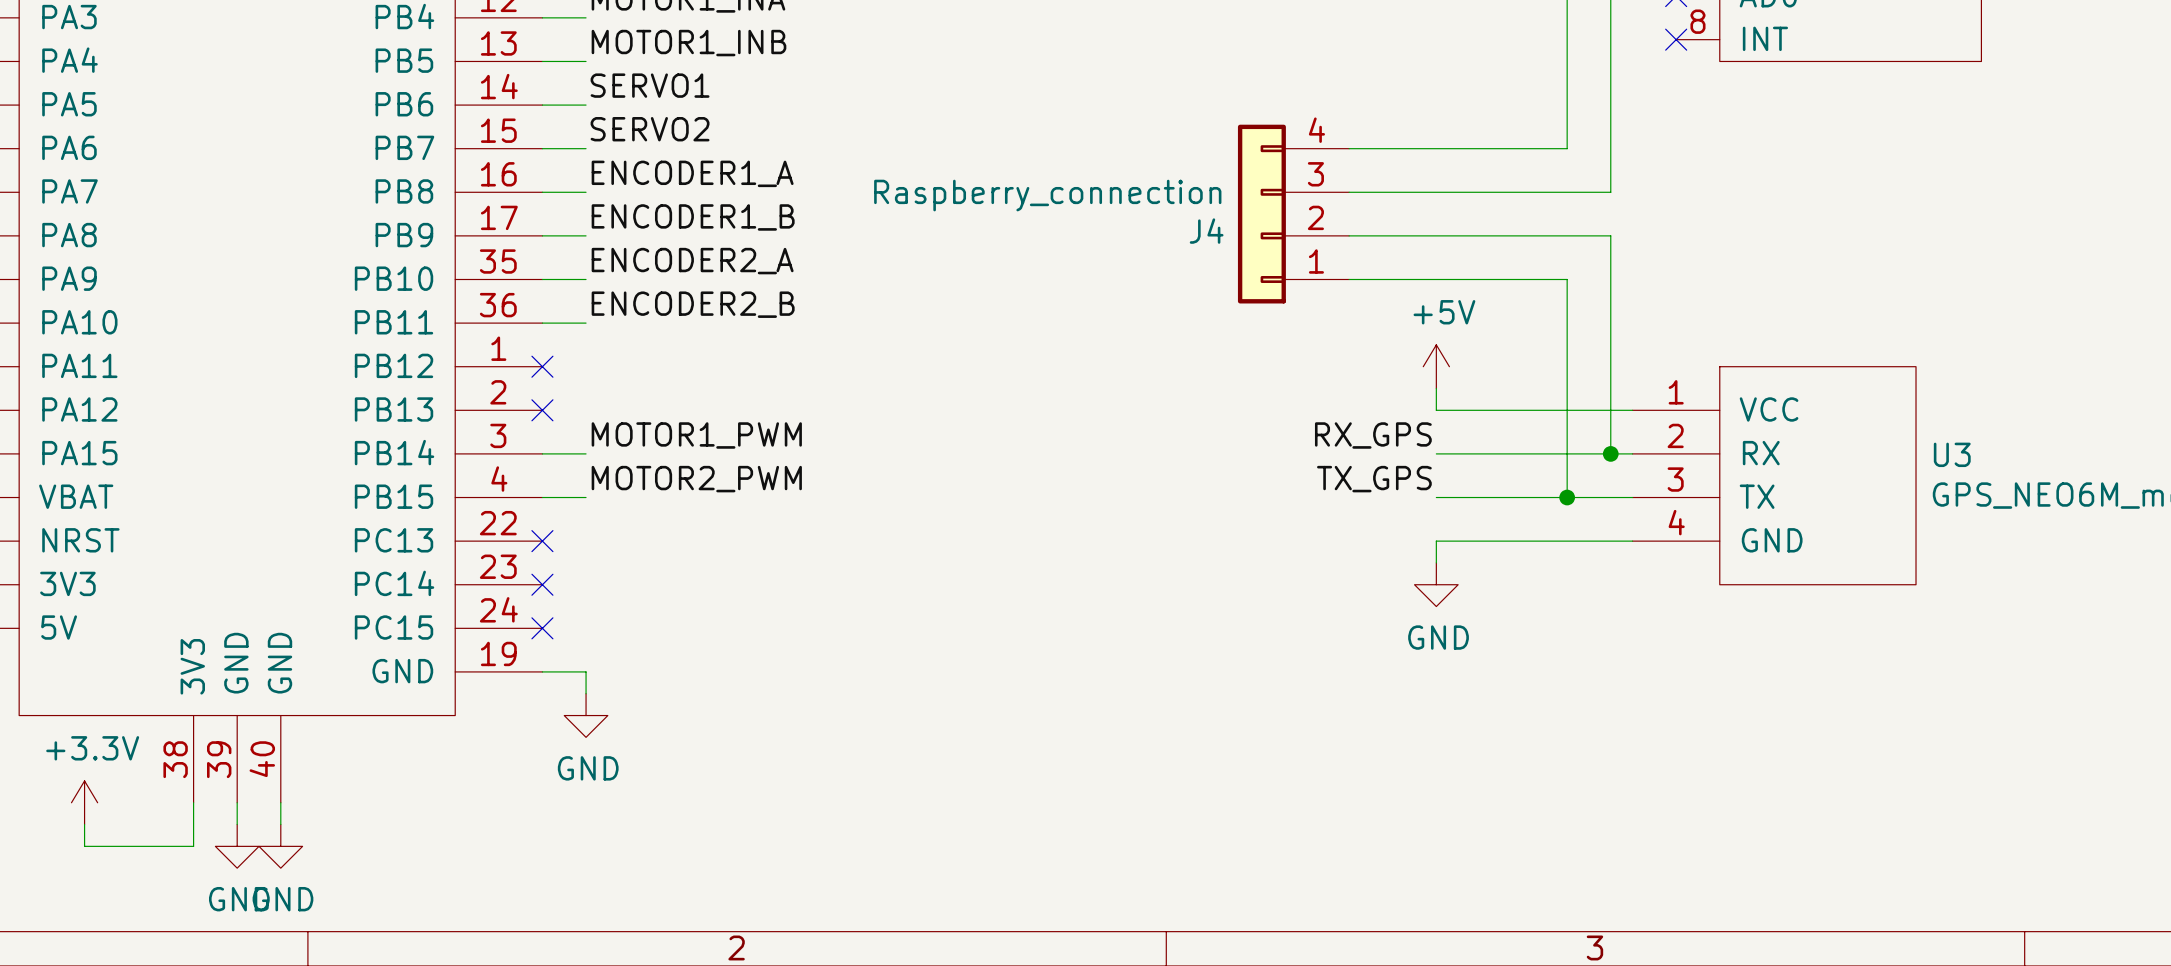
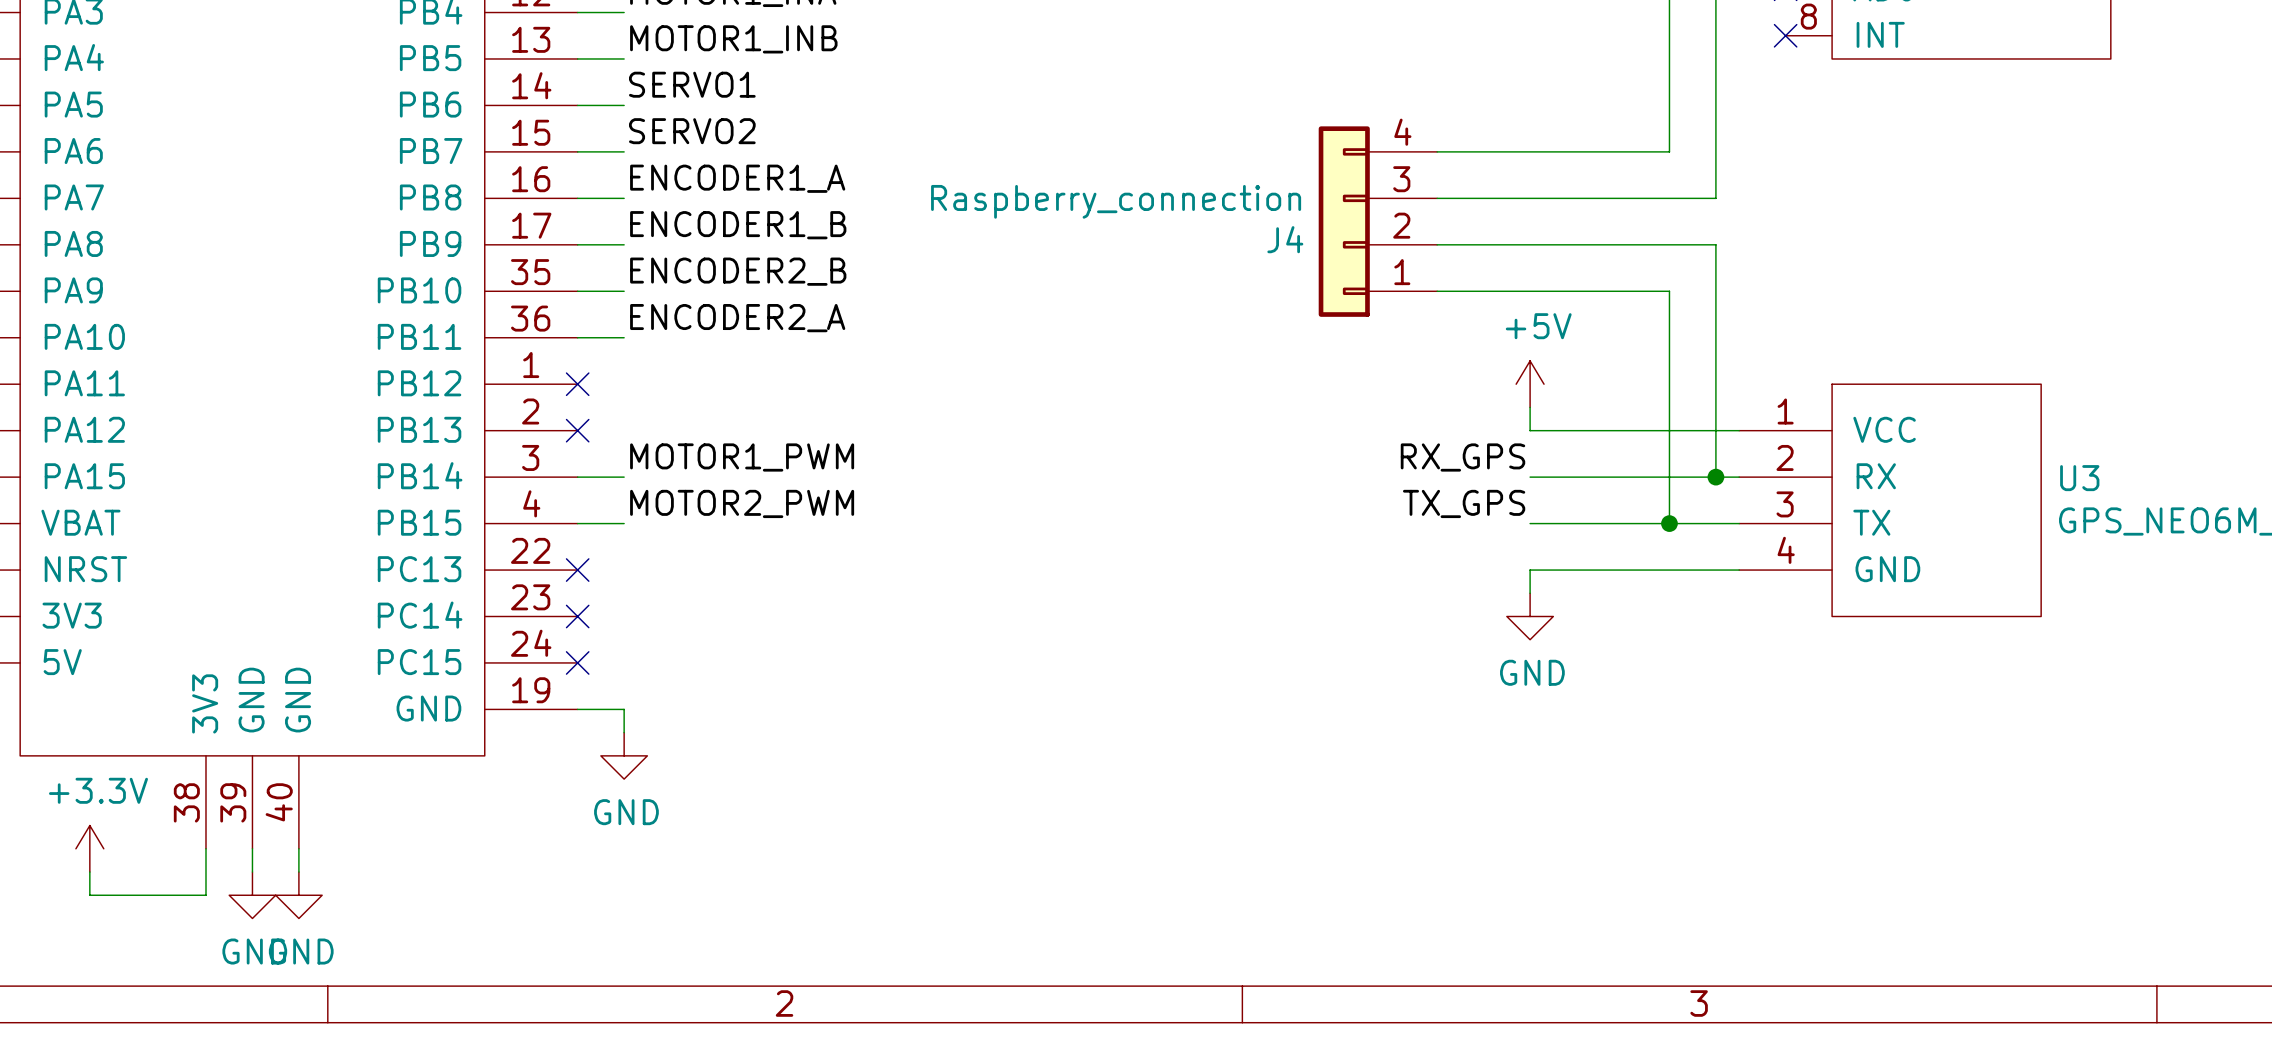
label: ENCODER2_A (692, 261) -> ENCODER2_B (738, 271)
label: ENCODER2_B (693, 304) -> ENCODER2_A (737, 318)

